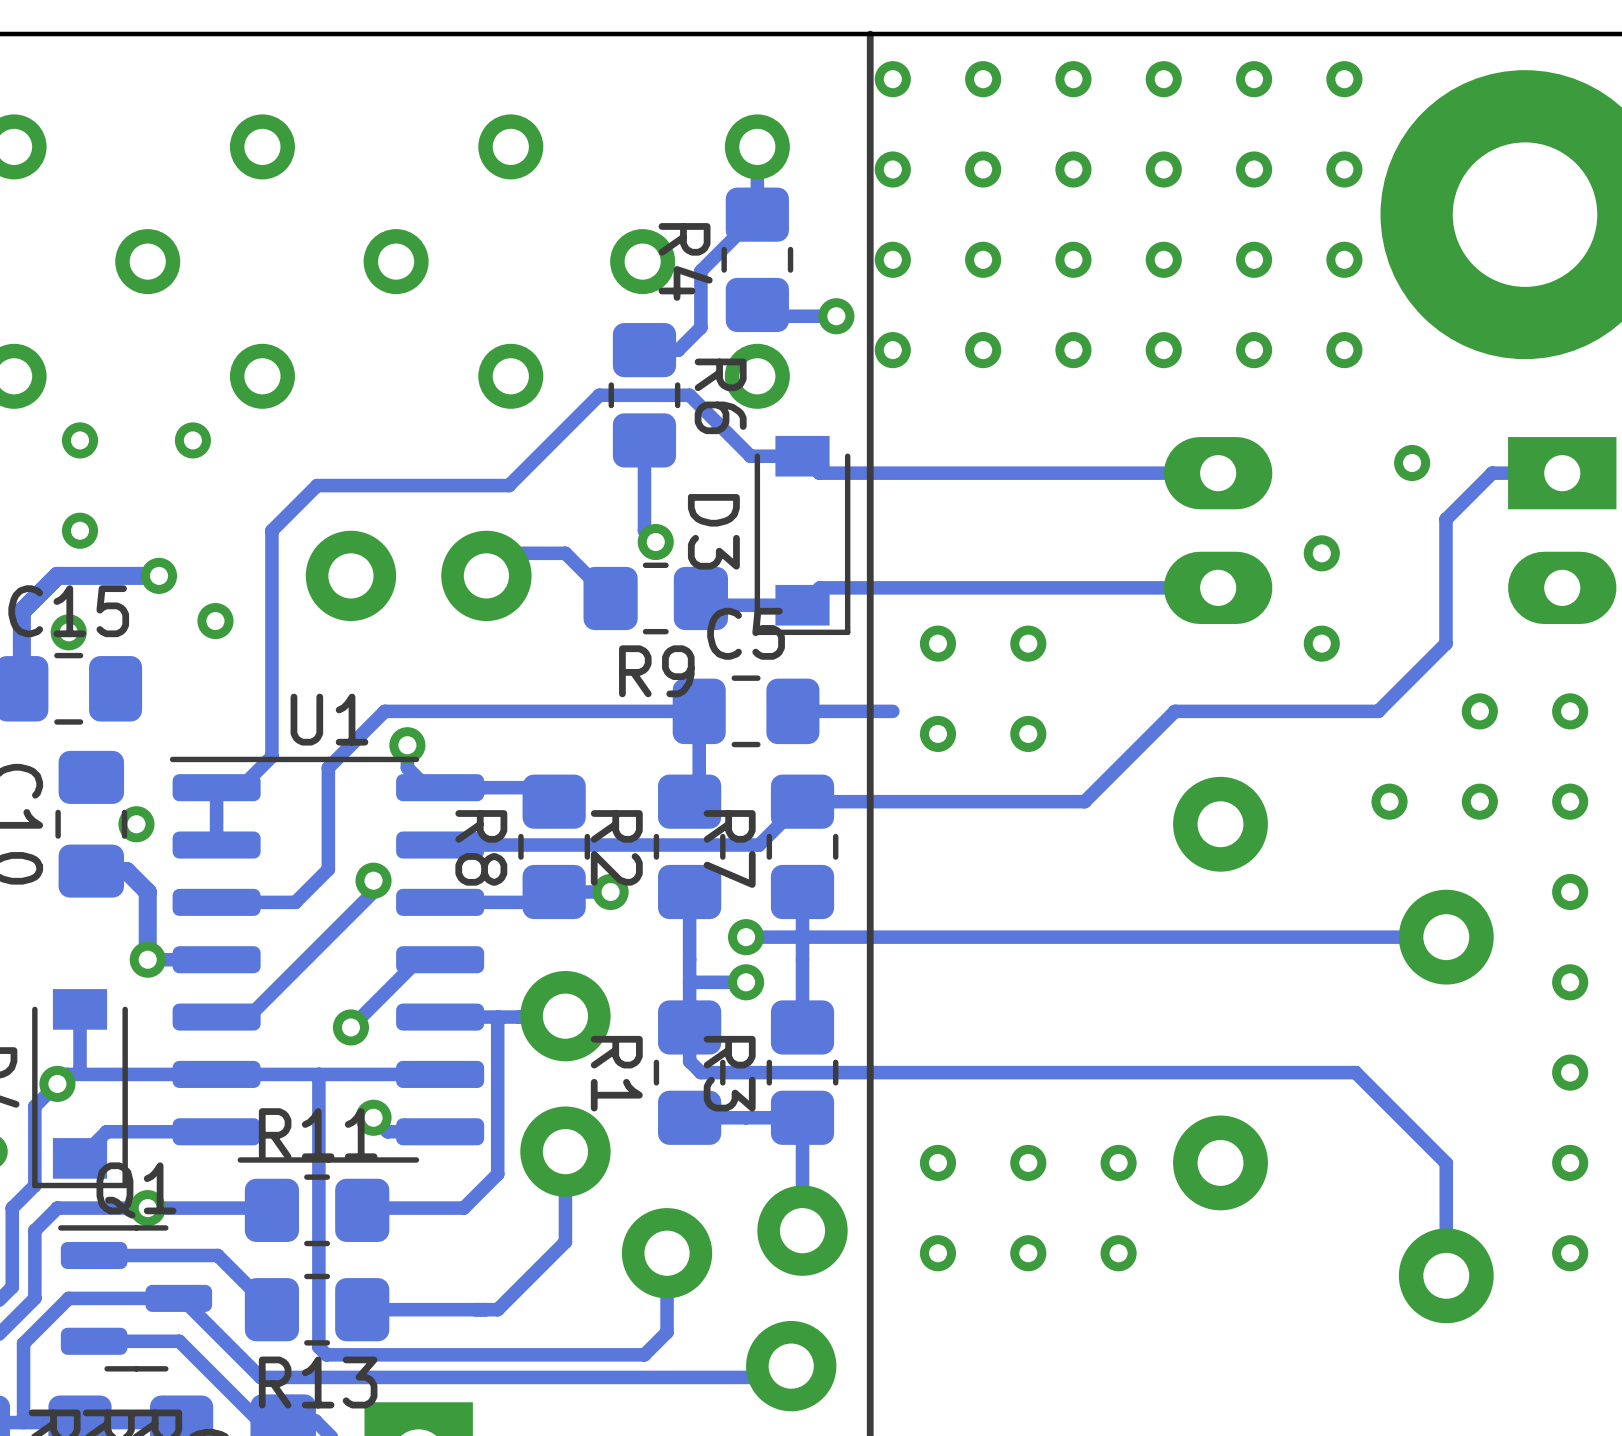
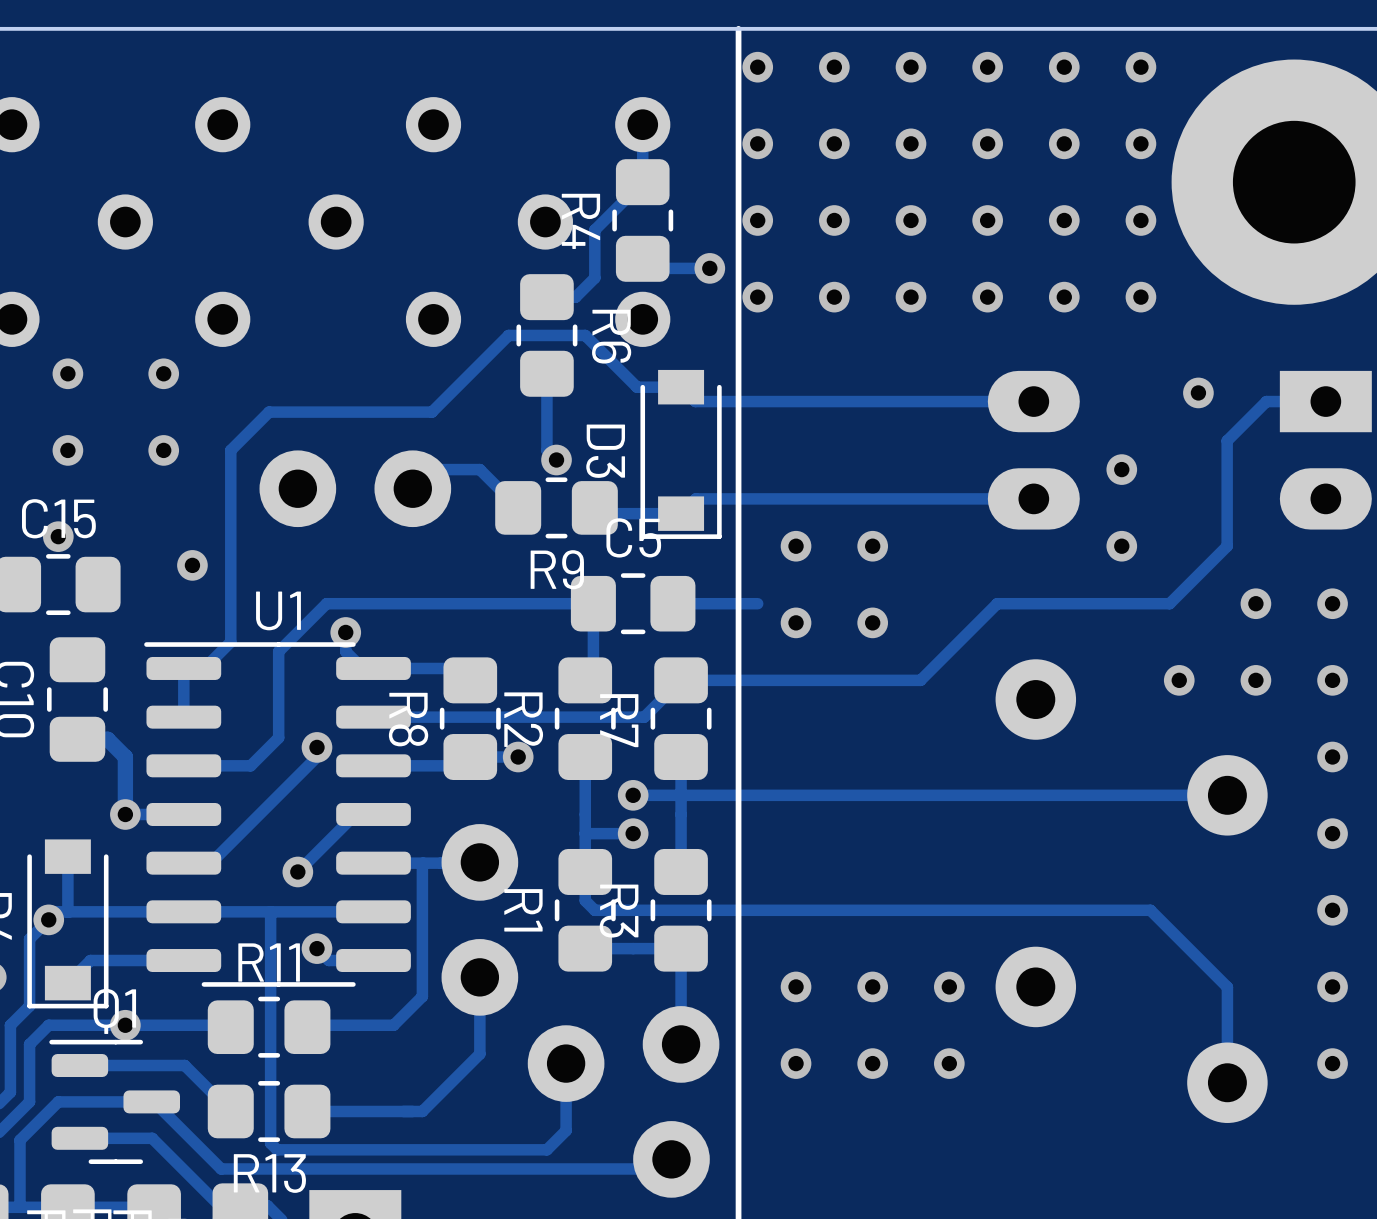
via: none -> (163, 450)
track: (159, 575) (57, 575) (21, 611) (21, 688) -> none
via: (159, 575) -> none
via: (215, 621) -> none
via: none -> (192, 565)
via: (136, 824) -> none

